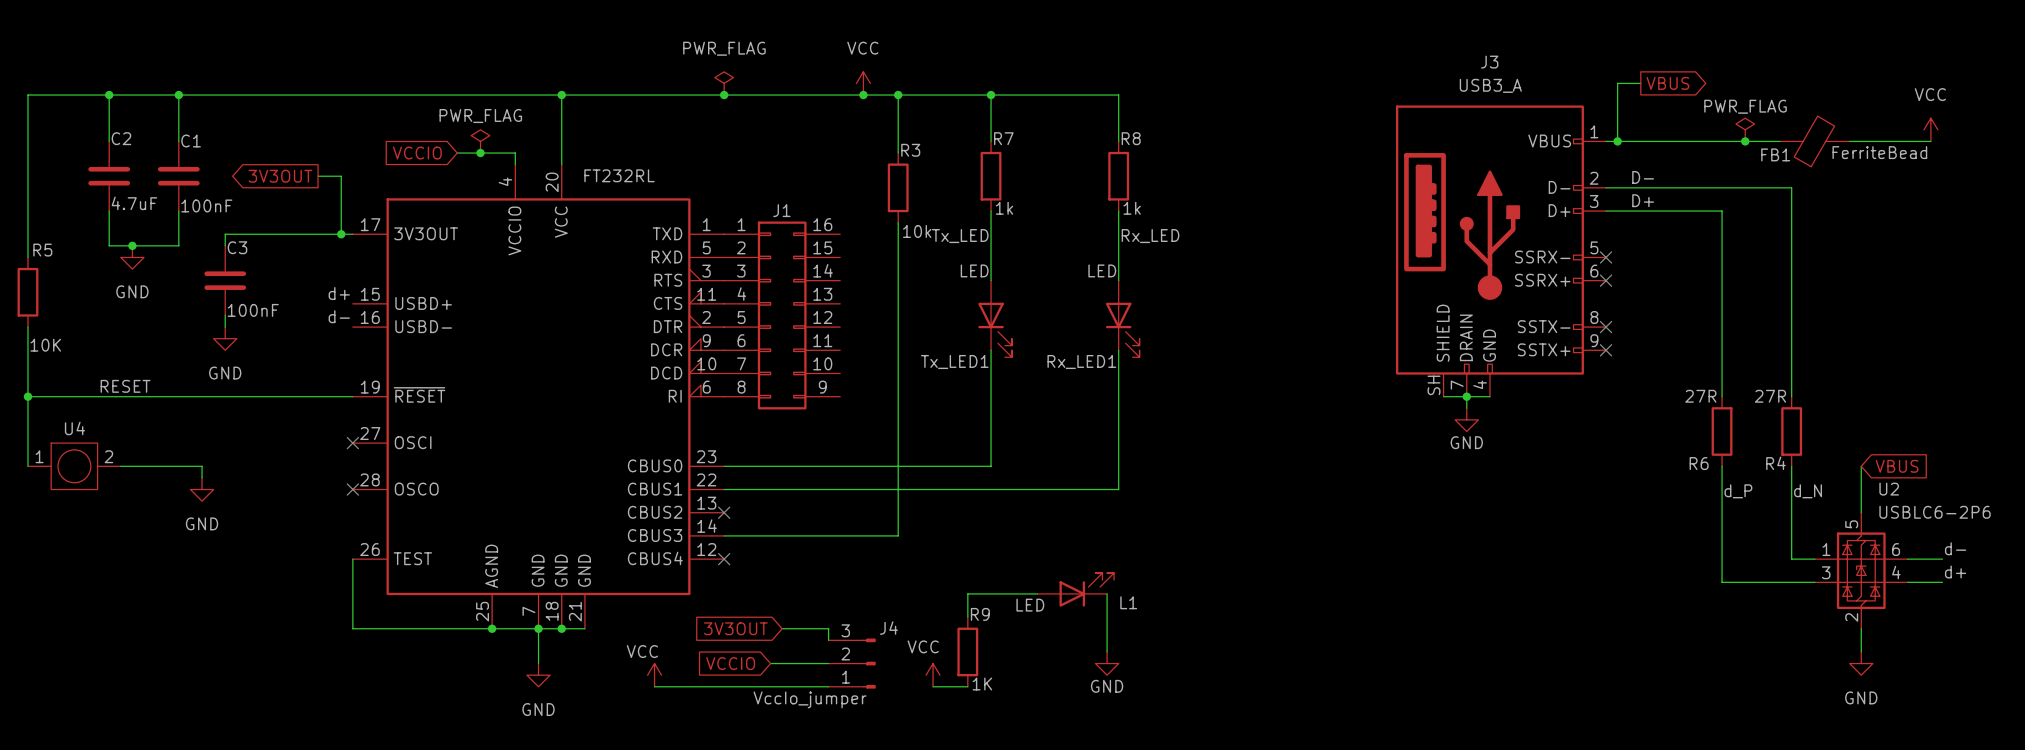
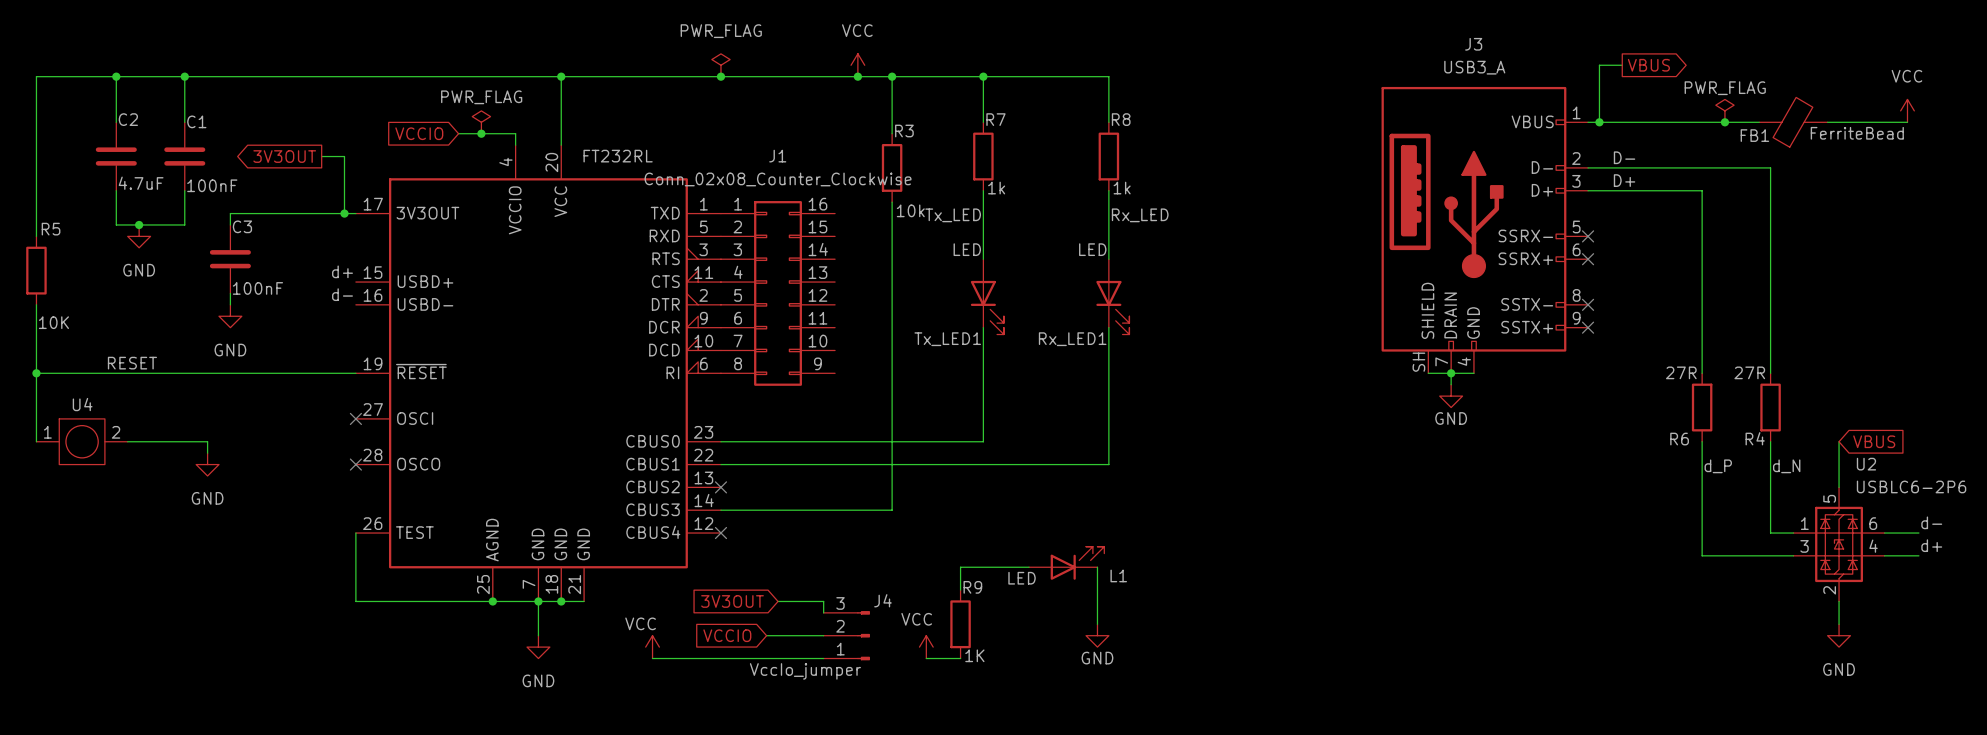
J1 value: none -> Conn_02x08_Counter_Clockwise (778, 179)
J1 name position: J1 (781, 210) -> J1 (777, 156)

